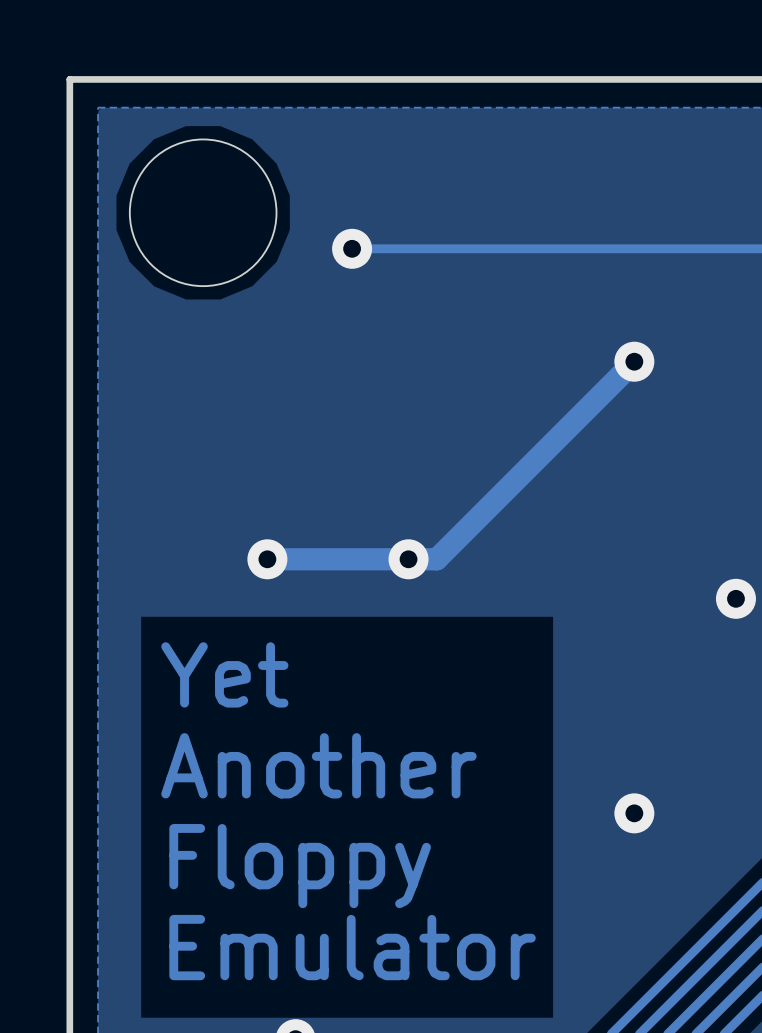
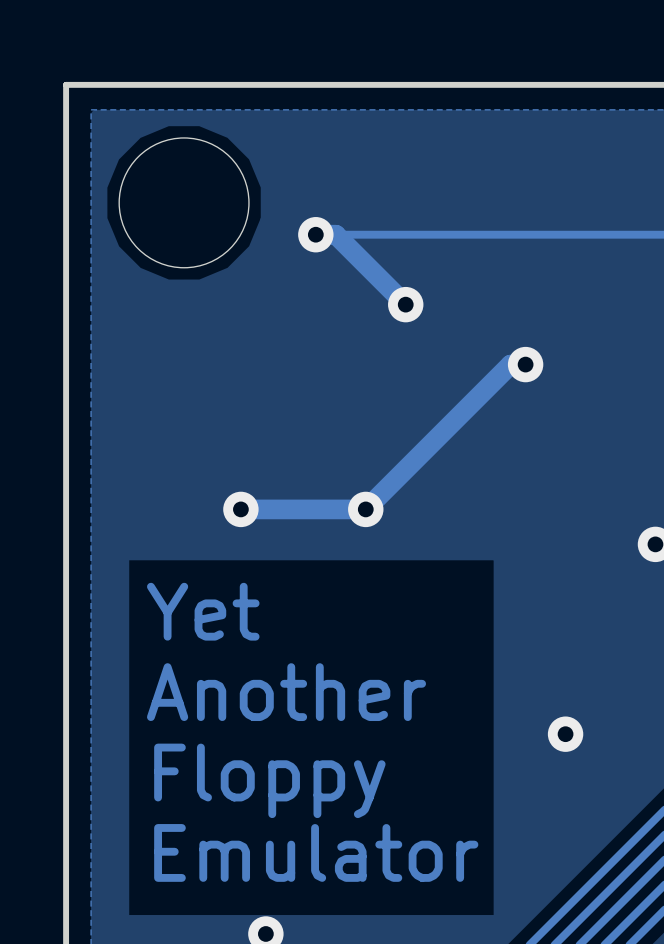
track: none -> (315, 234) (335, 234) (405, 304)
via: none -> (405, 304)
track: (634, 361) (436, 559) (408, 559) -> (525, 364) (510, 364) (365, 509)
via position: (634, 361) -> (525, 364)

